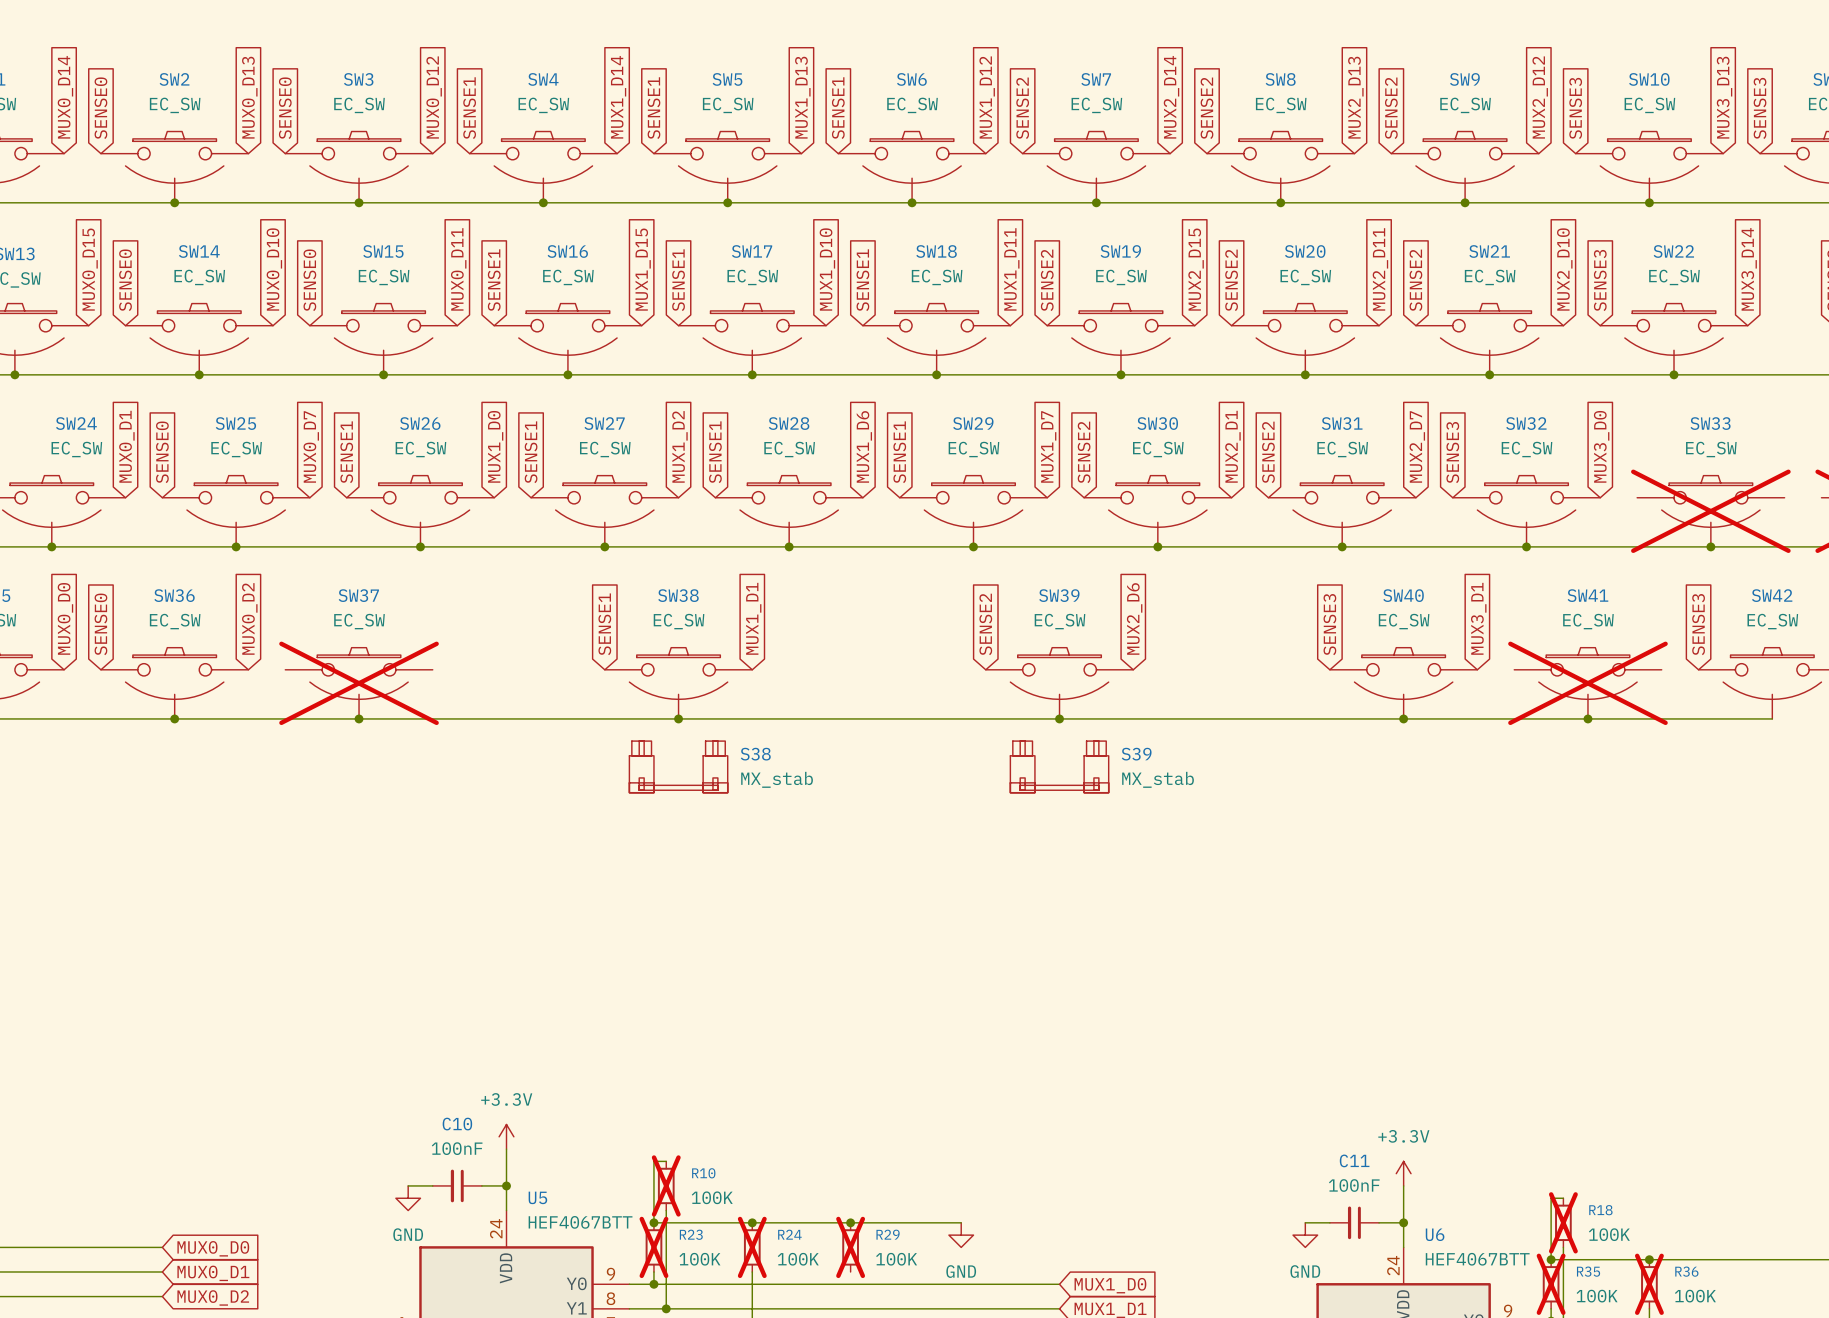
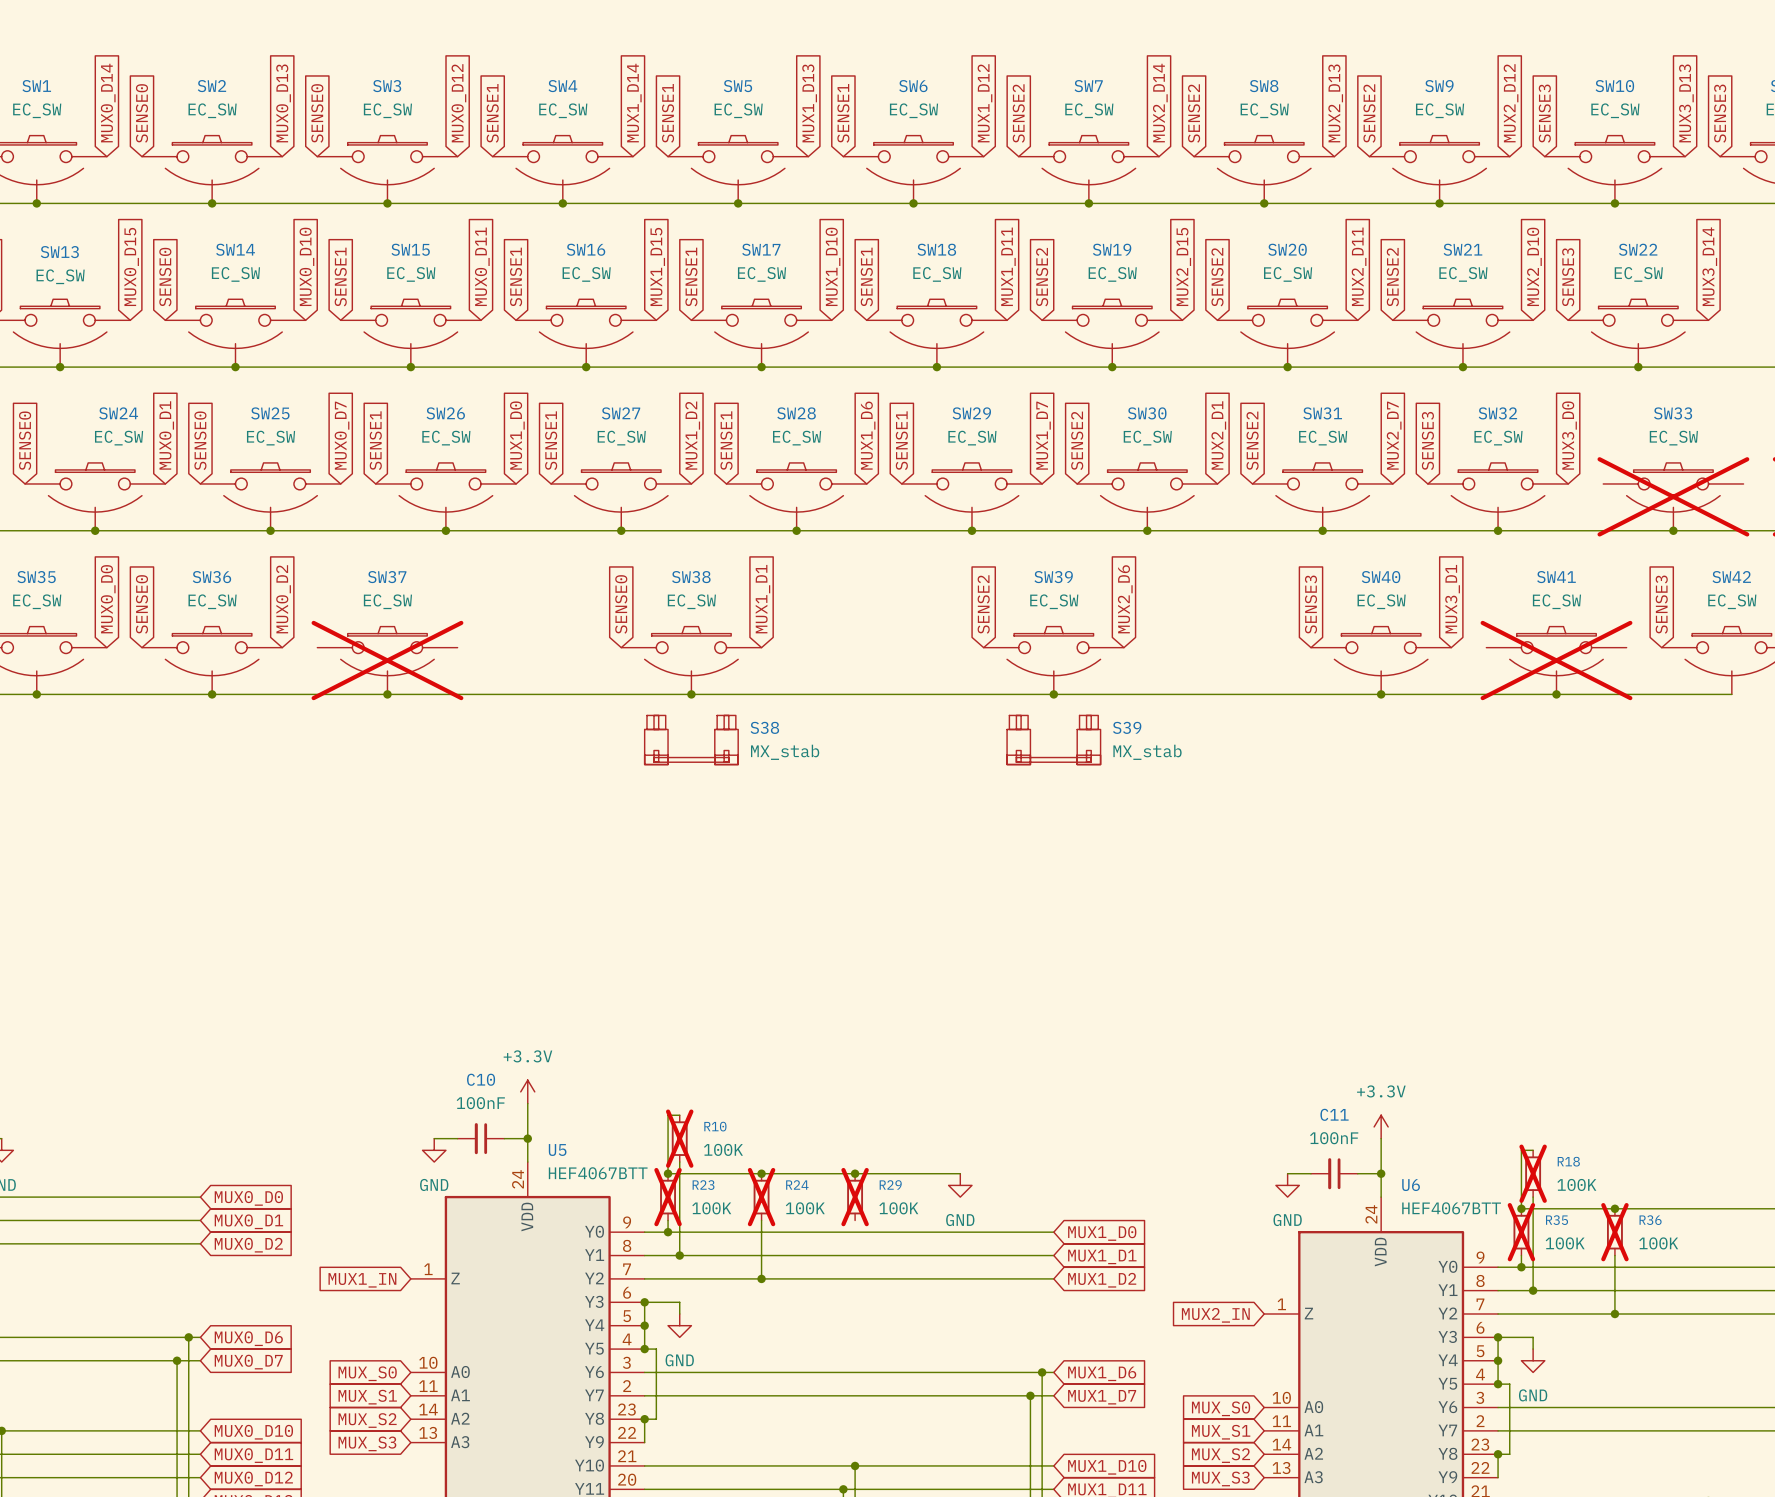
global label: SENSE0 (309, 280) -> SENSE1 (340, 277)
global label: SENSE1 (604, 624) -> SENSE0 (621, 604)

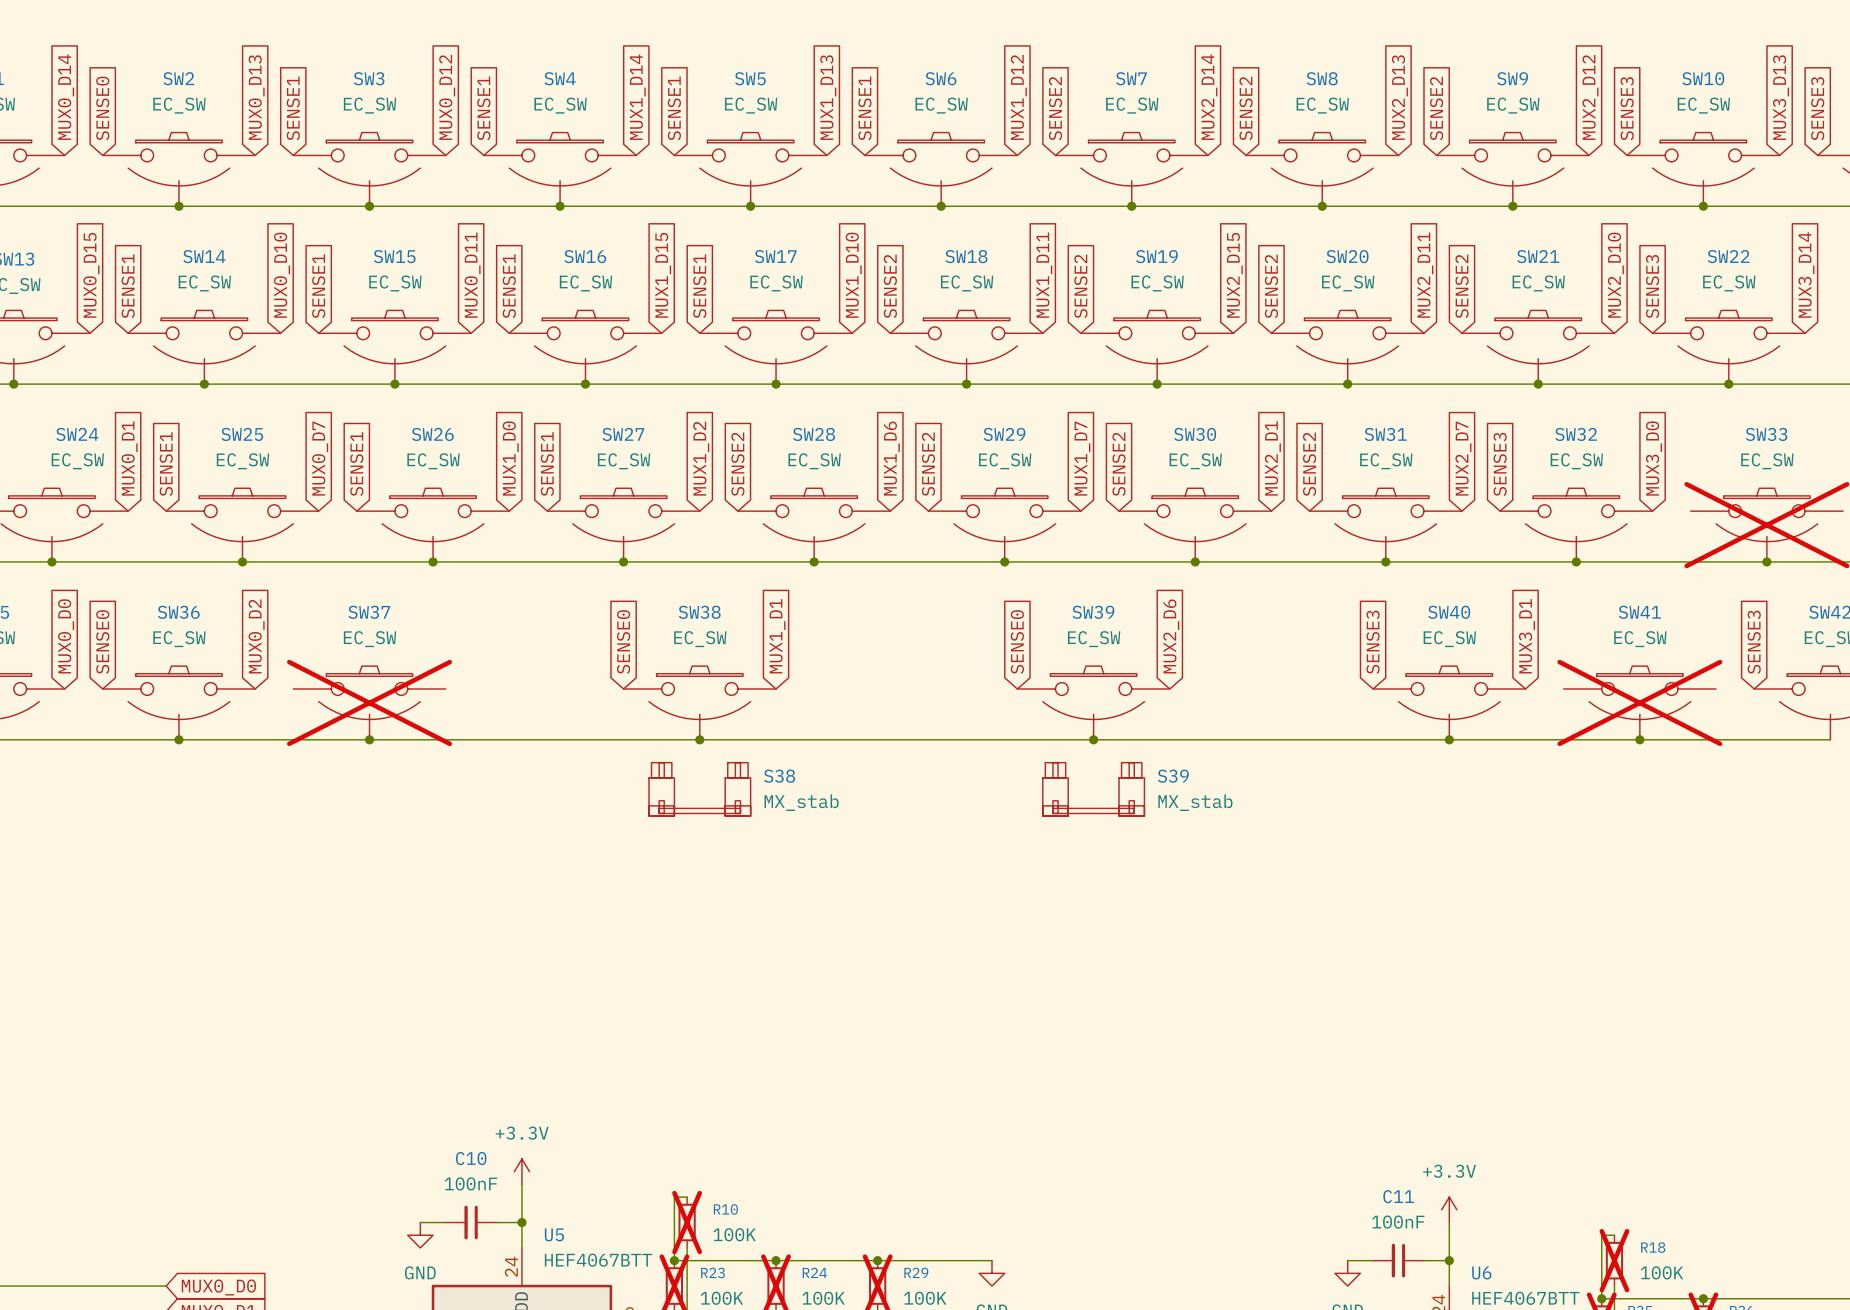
global label: SENSE0 (317, 113) -> SENSE1 (293, 108)
global label: SENSE0 (165, 277) -> SENSE1 (128, 286)
global label: SENSE1 (866, 277) -> SENSE2 (890, 286)
global label: SENSE0 (200, 440) -> SENSE1 (166, 464)
global label: SENSE1 (726, 440) -> SENSE2 (737, 464)
global label: SENSE1 (901, 440) -> SENSE2 (928, 464)
global label: SENSE2 (983, 604) -> SENSE0 (1017, 642)

